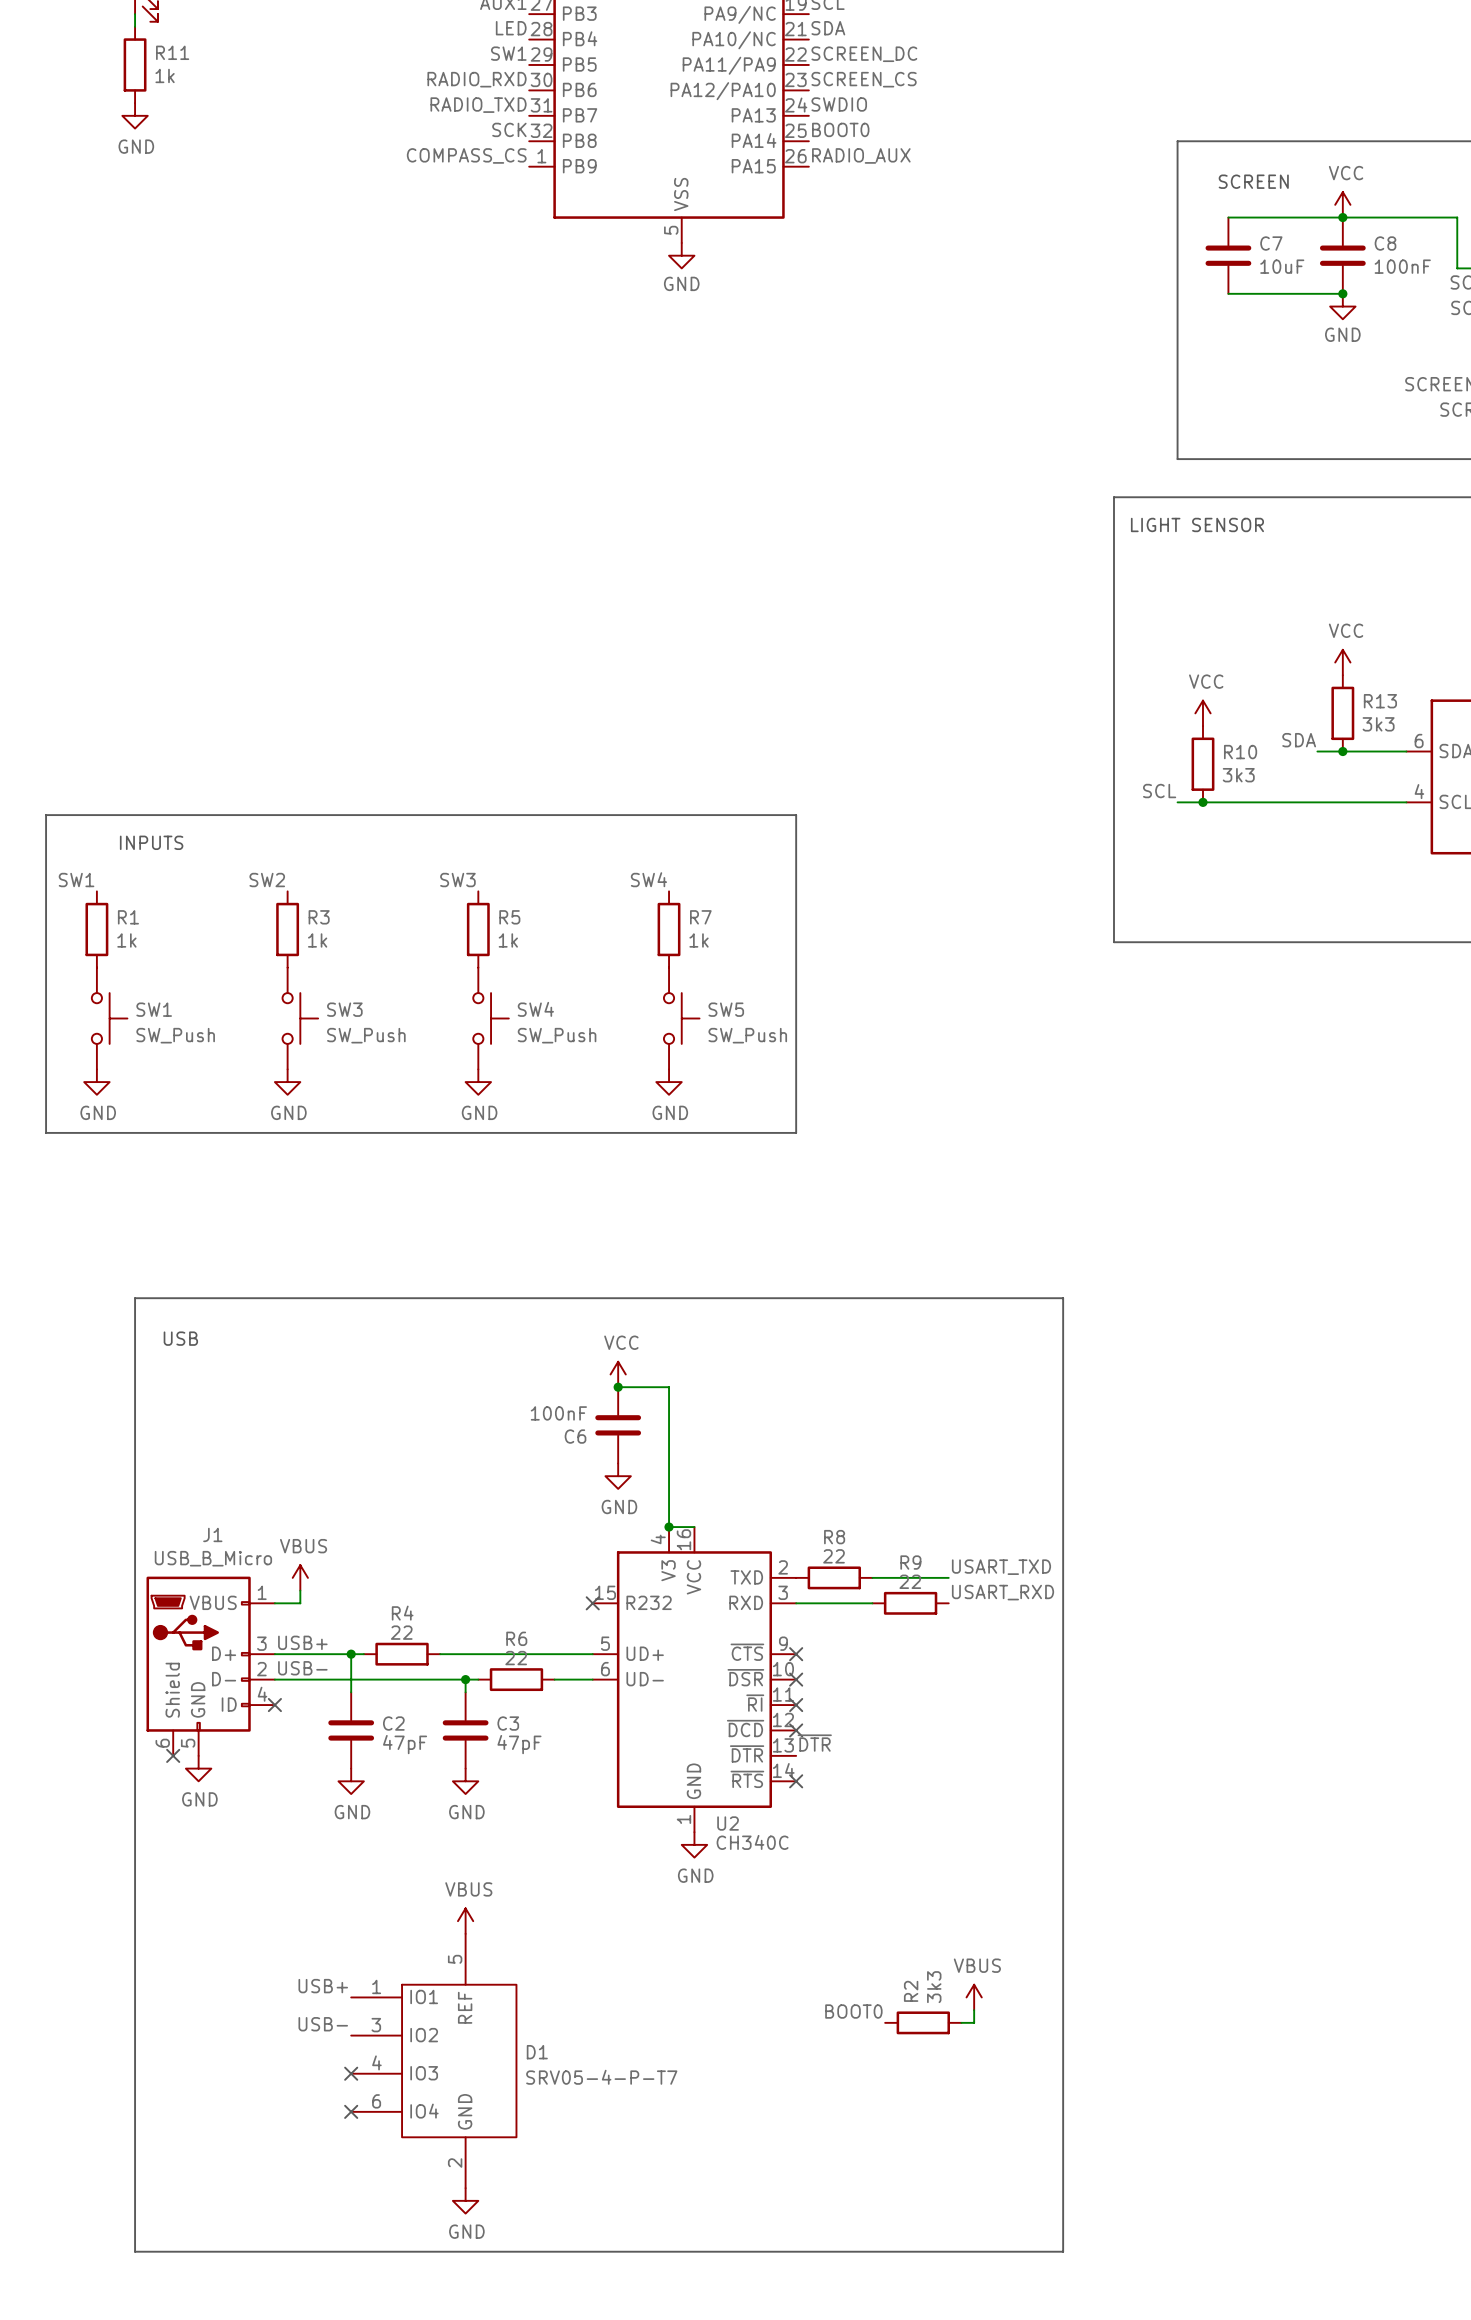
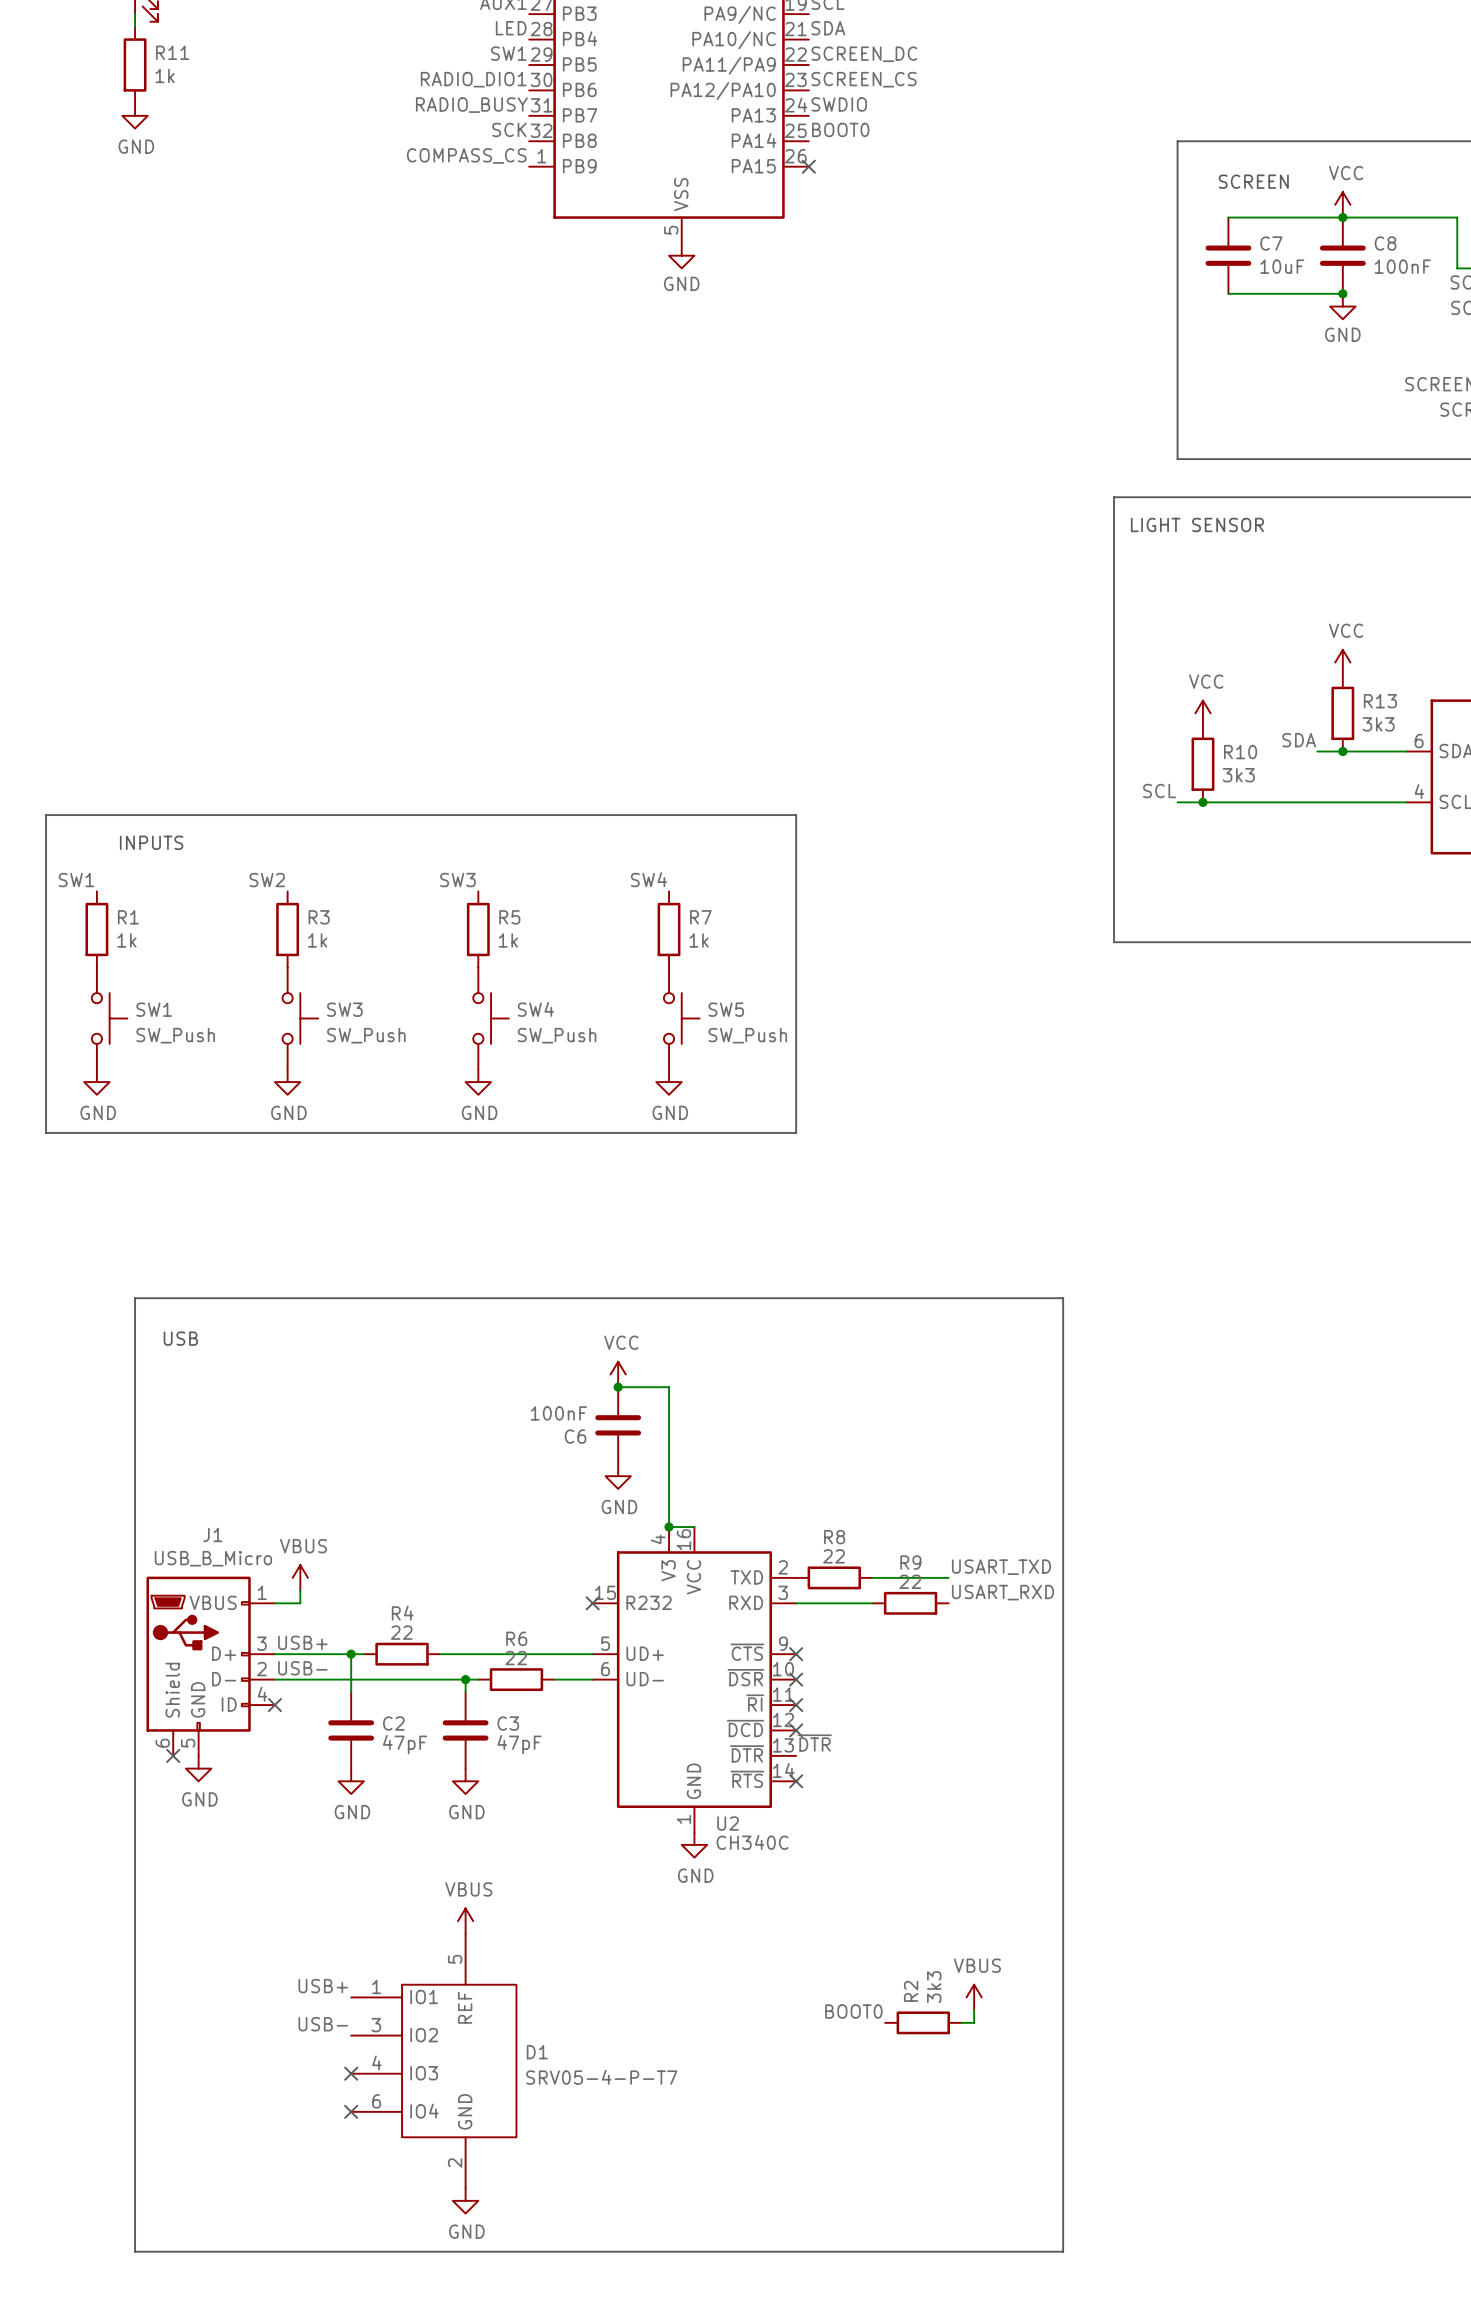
label: RADIO_RXD (477, 79) -> RADIO_DIO1 (473, 79)
label: RADIO_TXD (478, 105) -> RADIO_BUSY (471, 105)
label: RADIO_AUX (861, 155) -> none
no-connect mark: none -> (808, 166)

